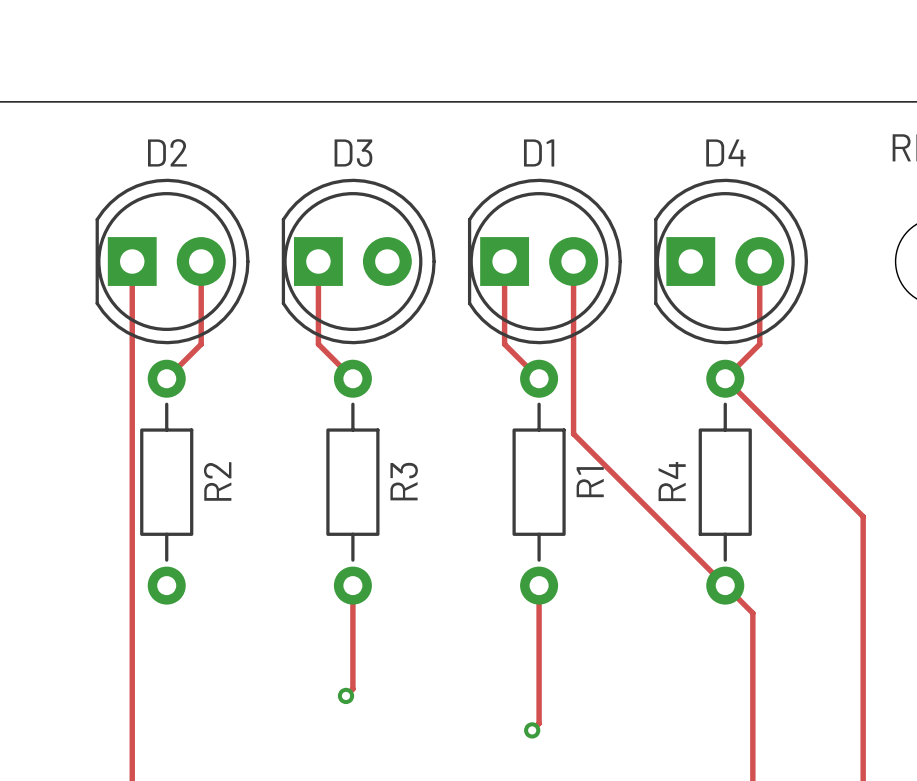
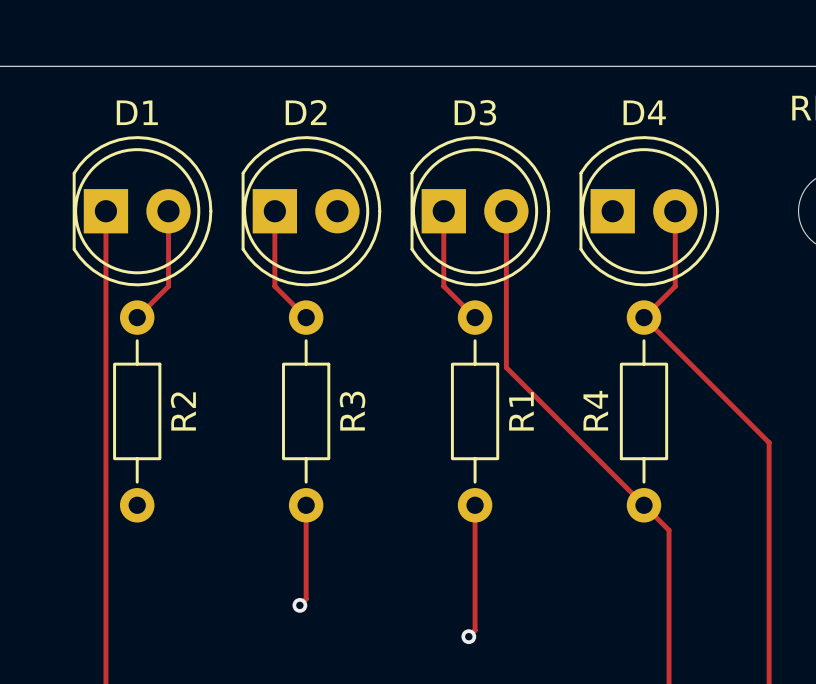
D2 name: D2 (167, 152) -> D1 (137, 112)
D1 name: D1 (539, 152) -> D3 (475, 112)
D3 name: D3 (353, 153) -> D2 (306, 112)

